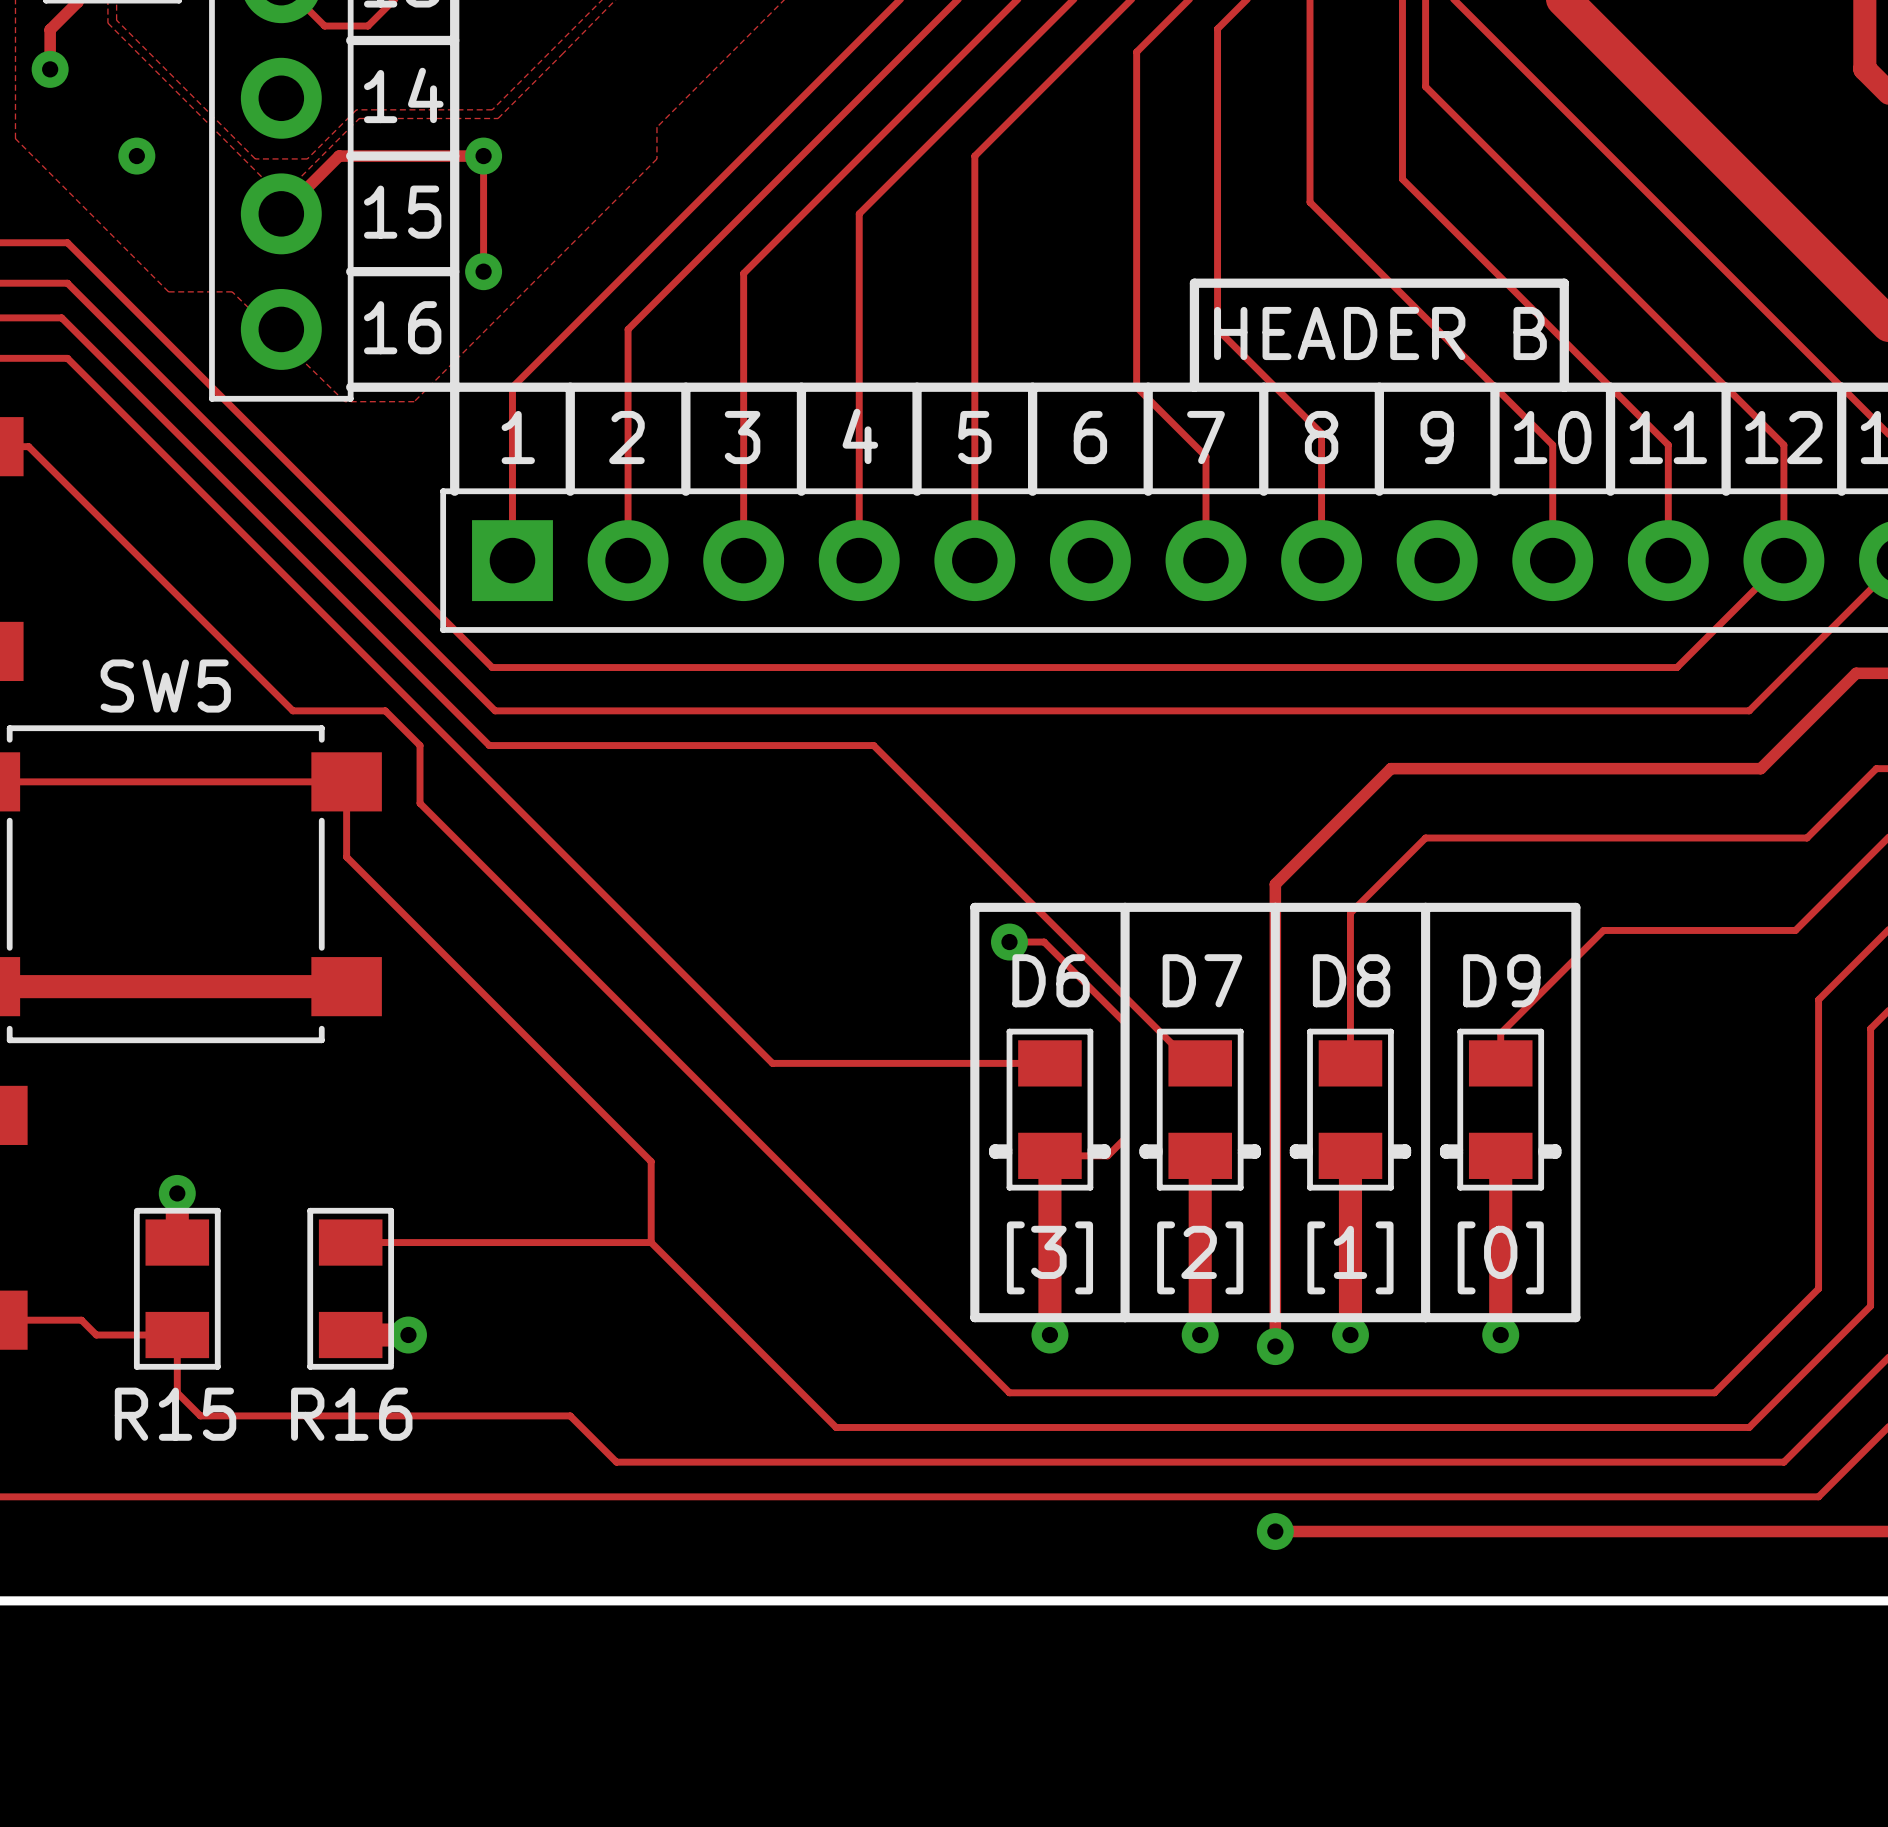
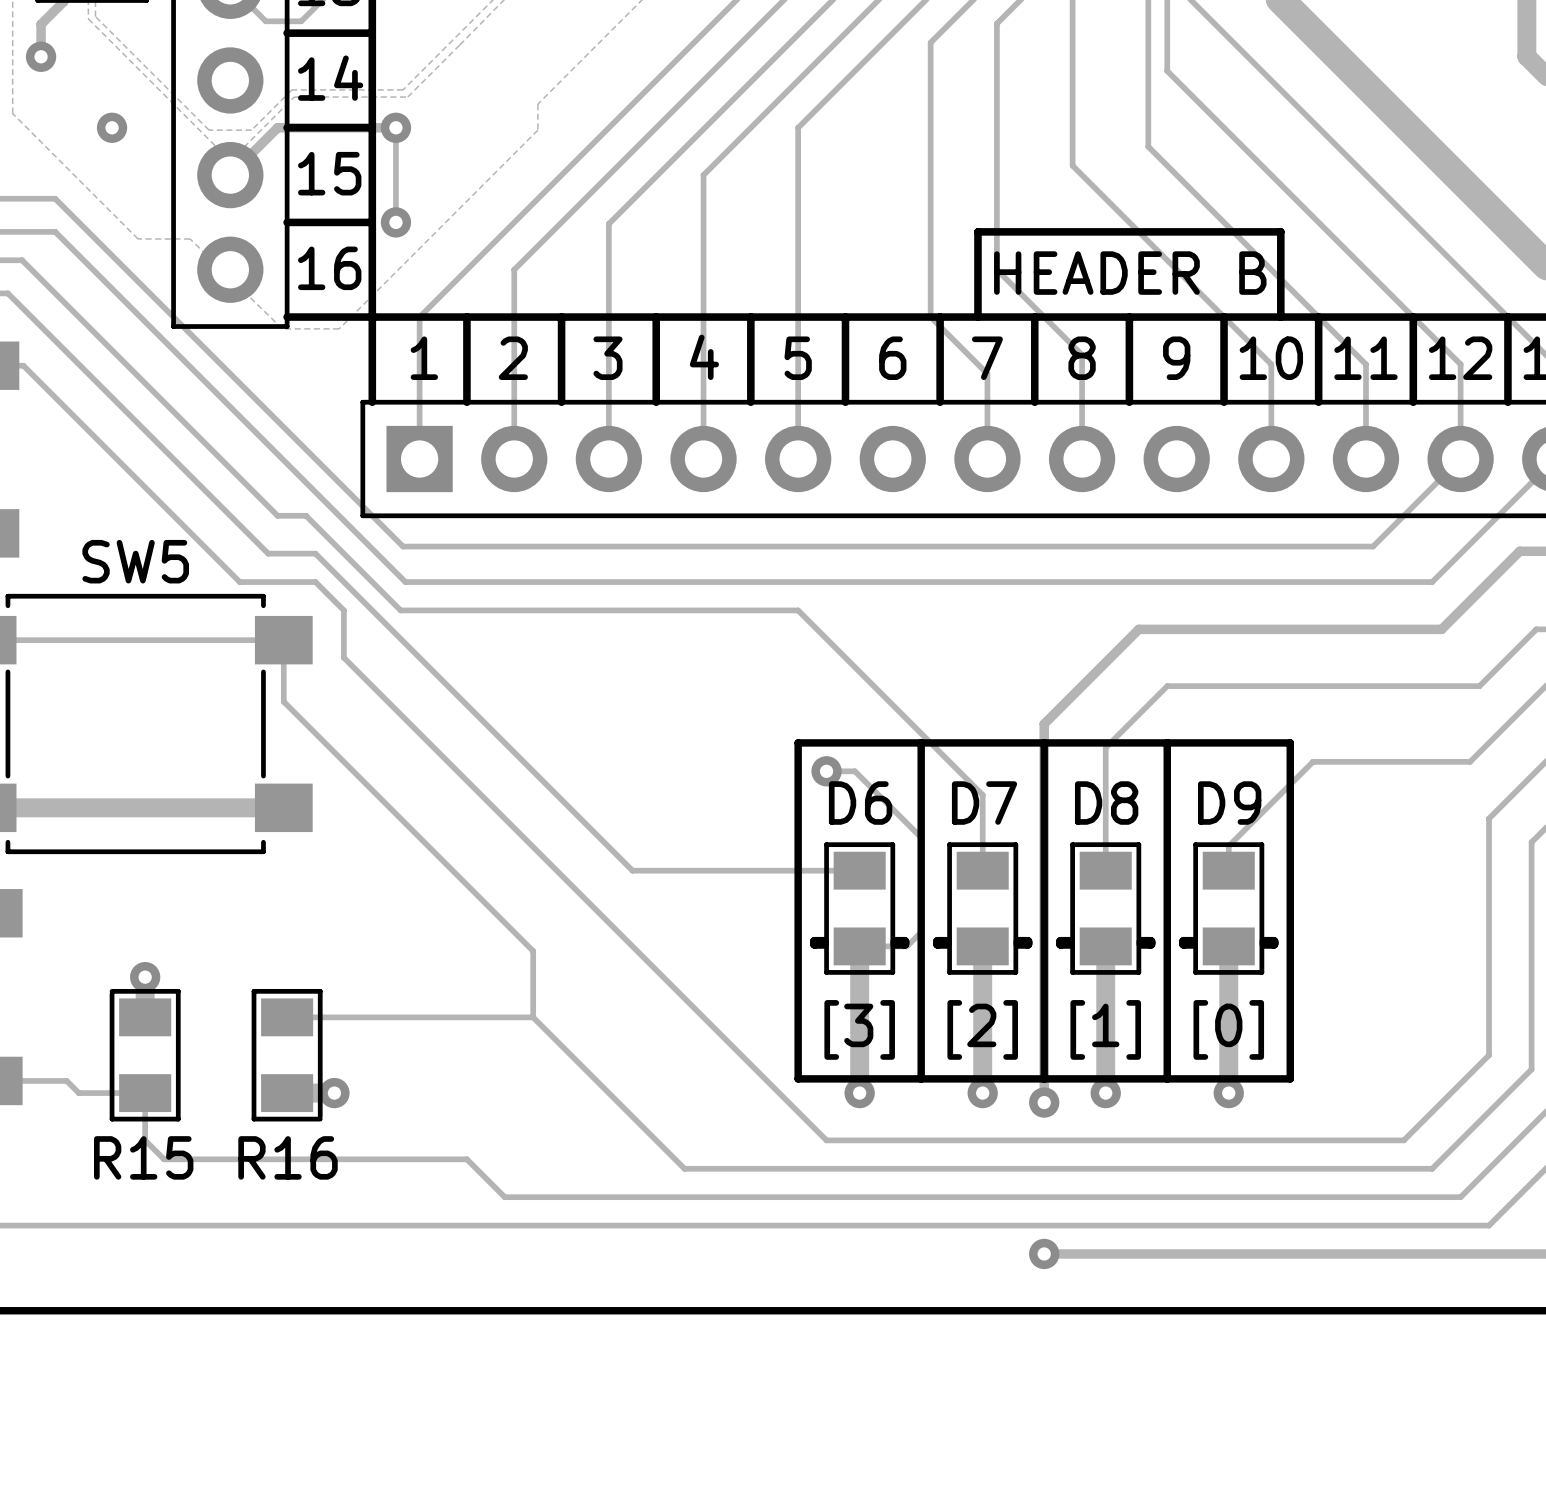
track: (27, 317) (61, 317) (373, 629) -> none
track: (9, 358) (67, 358) -> (22, 260) (55, 293)
track: none -> (7, 293) (268, 553) (315, 553)
track: (339, 629) (385, 676) -> (277, 515) (306, 515)
track: (873, 745) (1191, 1063) (1200, 1063) -> (715, 610) (798, 610) (982, 794) (982, 870)

